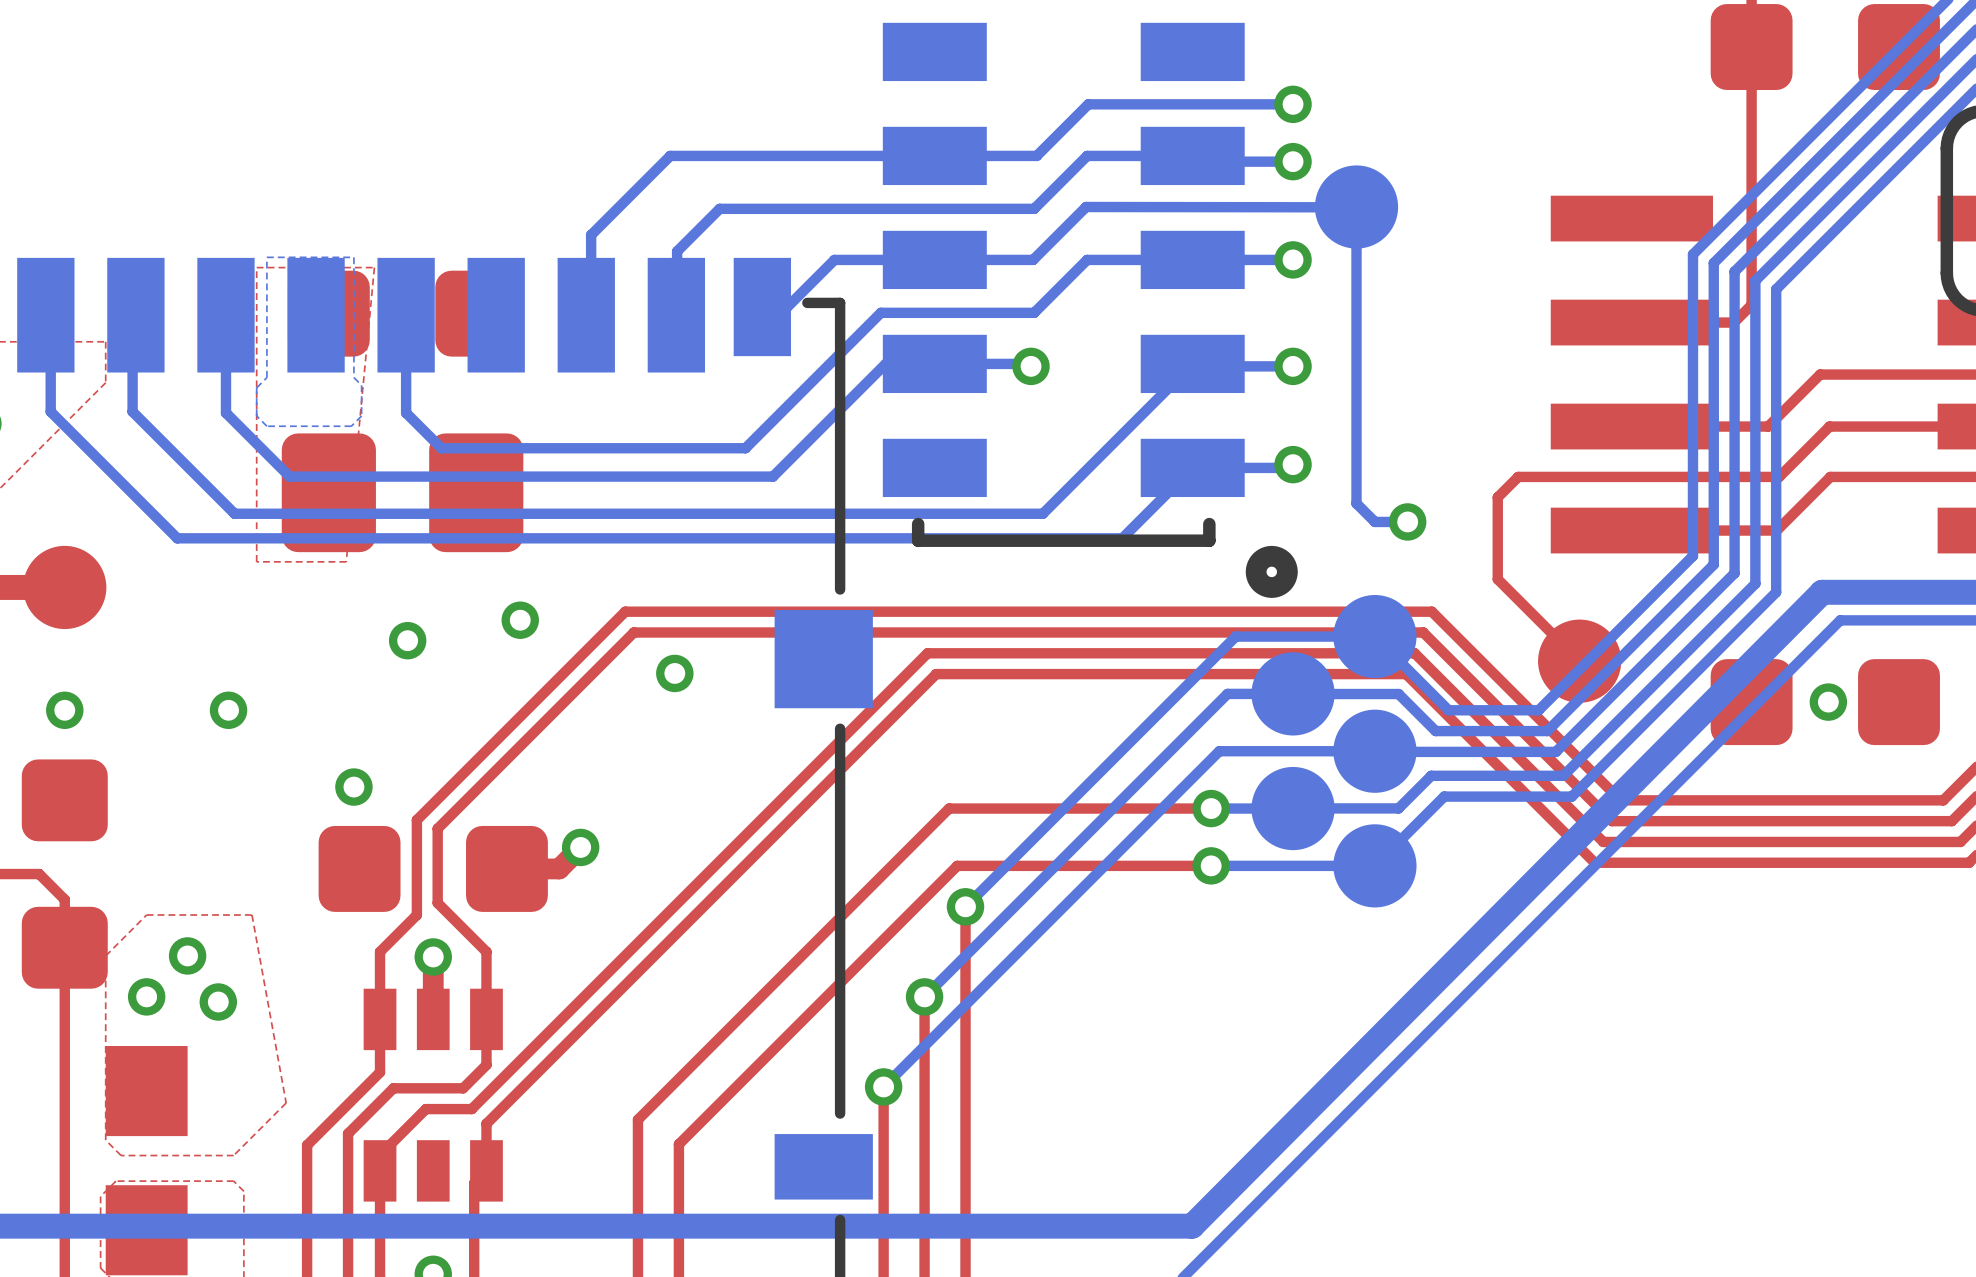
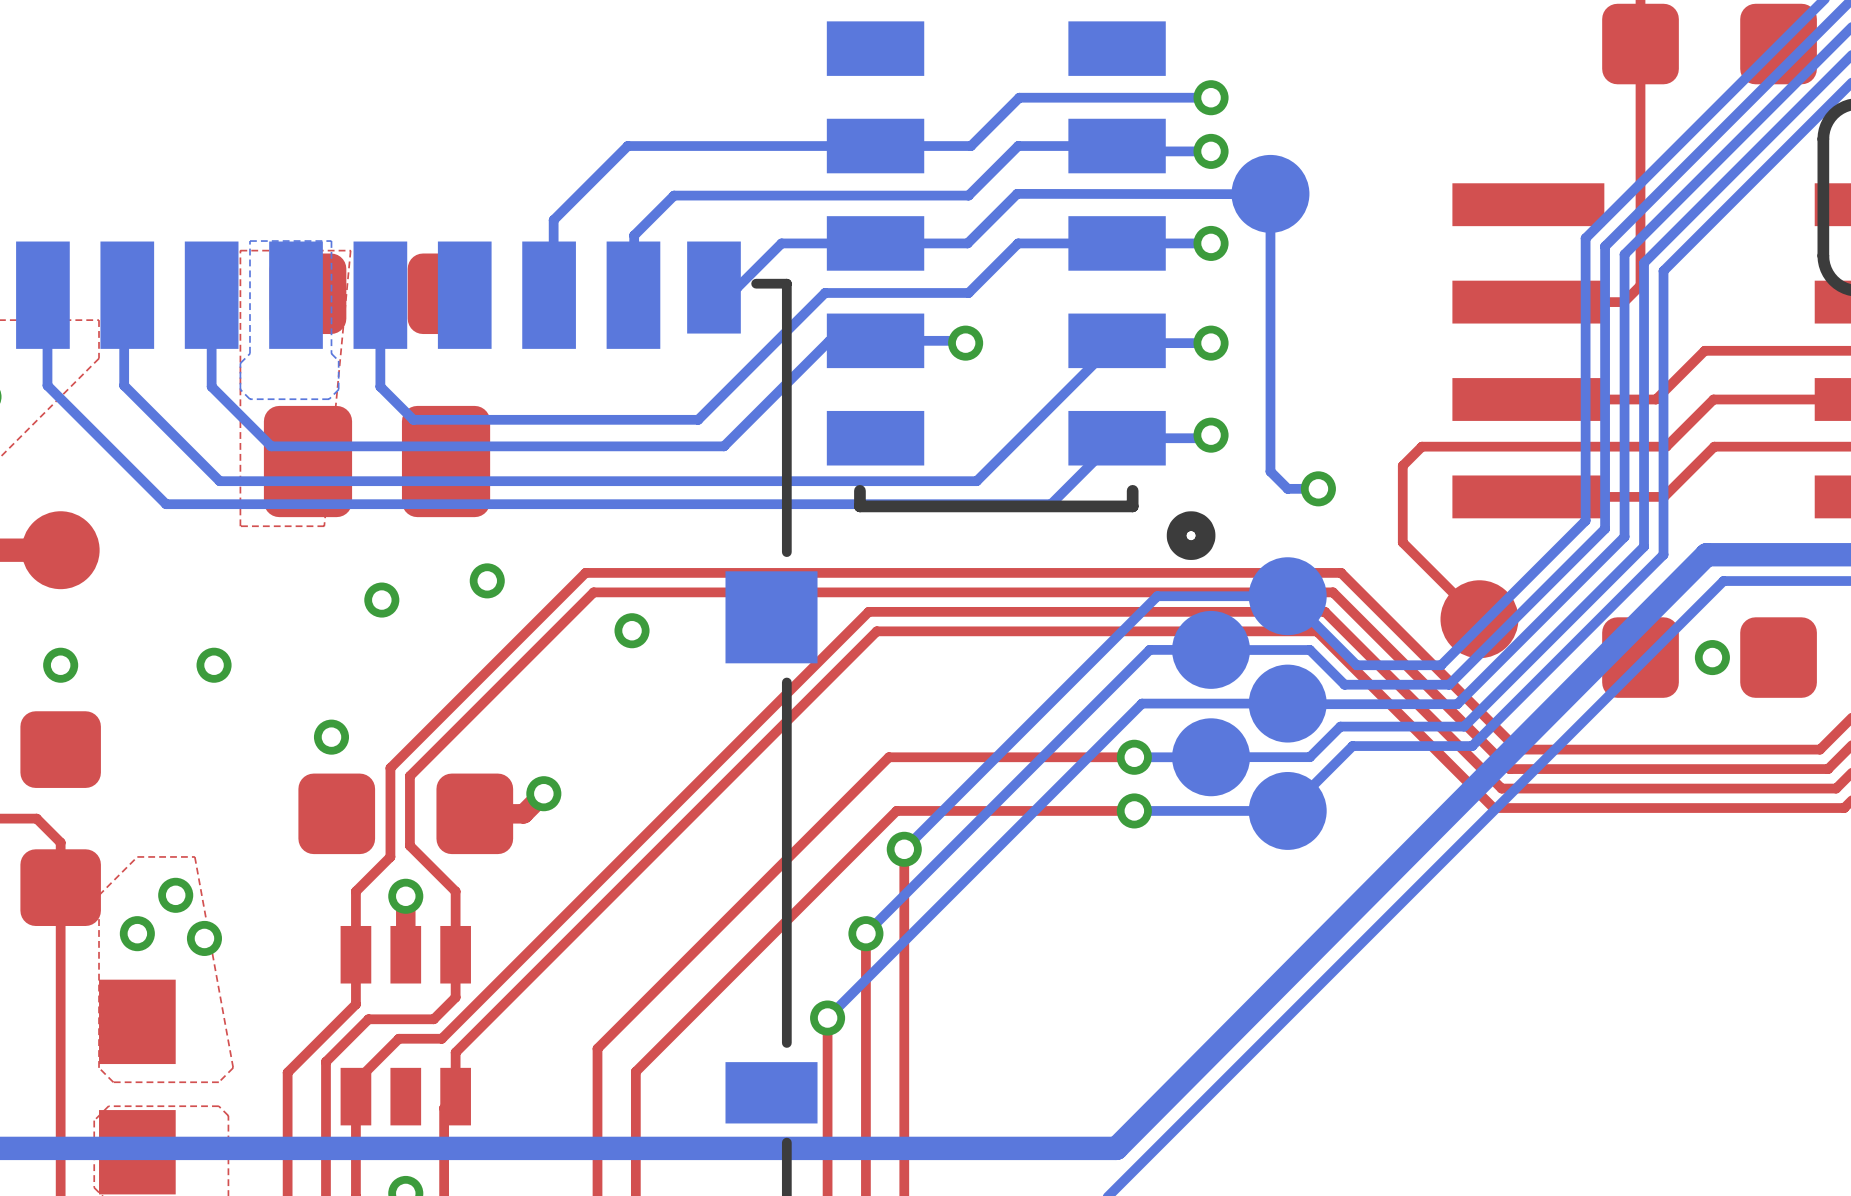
top zone outline: (208, 915) (251, 915) (286, 1103) (249, 1140) -> (194, 856) (233, 1067)

